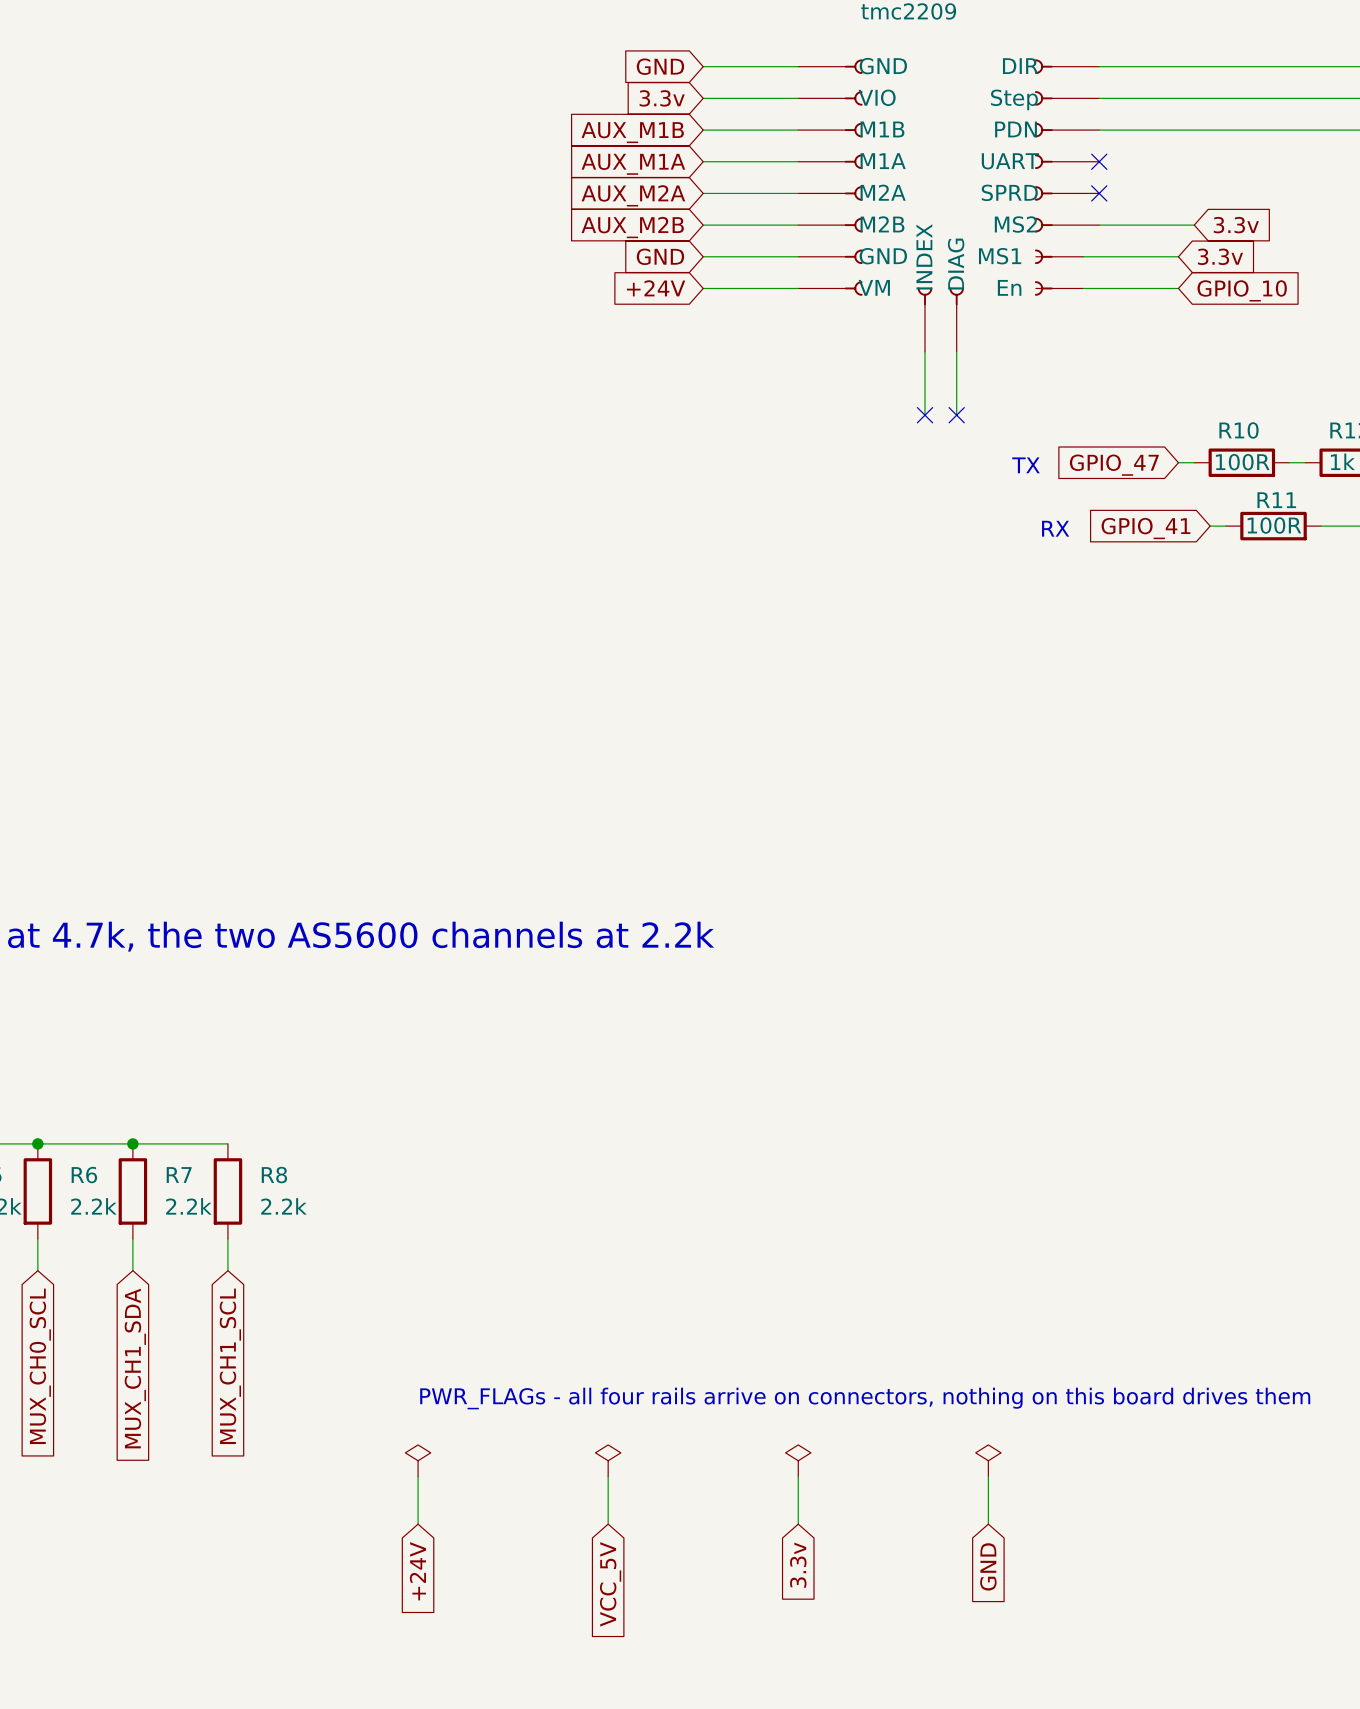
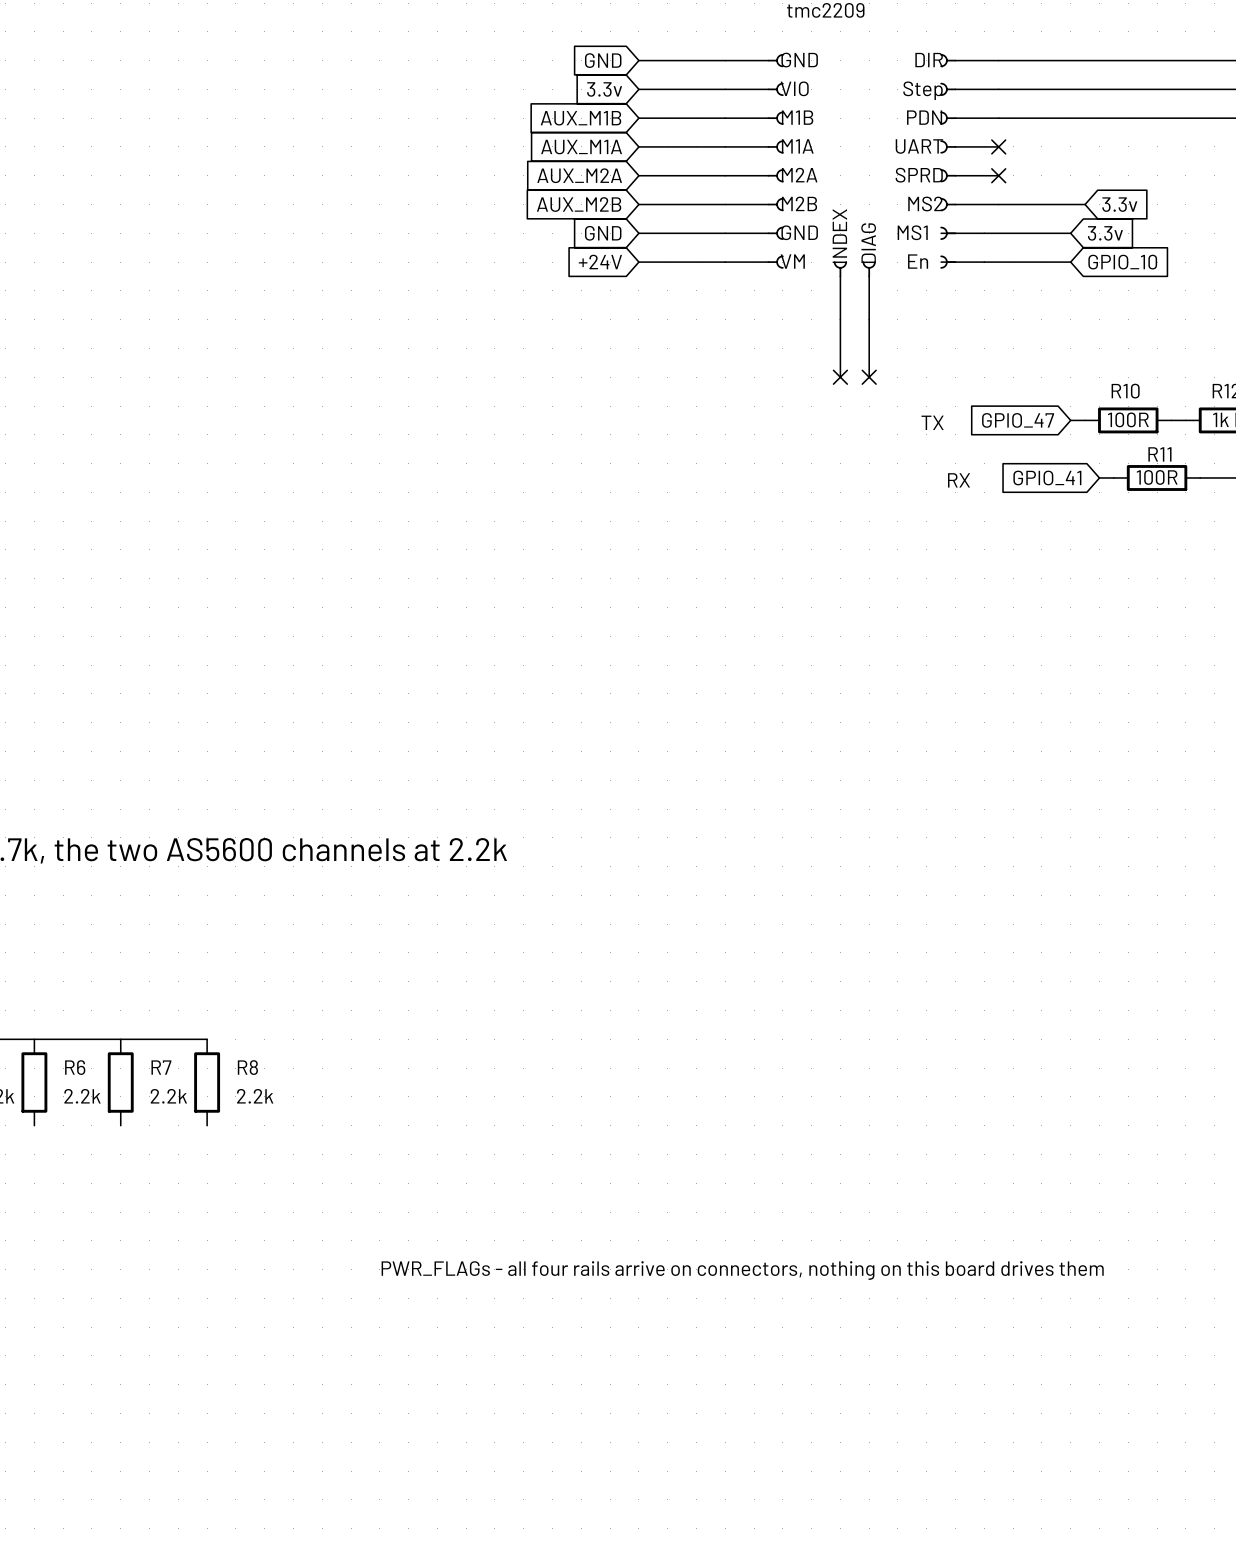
junction: (37, 1143) -> none
junction: (132, 1143) -> none
wire: (37, 1238) (37, 1270) -> none
wire: (132, 1238) (132, 1270) -> none
wire: (227, 1238) (227, 1270) -> none
global label: MUX_CH0_SCL (40, 1366) -> none
global label: MUX_CH1_SCL (230, 1366) -> none
global label: MUX_CH1_SDA (135, 1368) -> none
power symbol: (418, 1460) -> none
power symbol: (608, 1460) -> none
power symbol: (798, 1460) -> none
power symbol: (988, 1460) -> none
wire: (418, 1476) (418, 1524) -> none
wire: (608, 1476) (608, 1524) -> none
wire: (798, 1476) (798, 1524) -> none
wire: (988, 1476) (988, 1524) -> none
global label: 3.3v (798, 1565) -> none
global label: GND (988, 1566) -> none
global label: +24V (417, 1571) -> none
global label: VCC_5V (610, 1584) -> none

